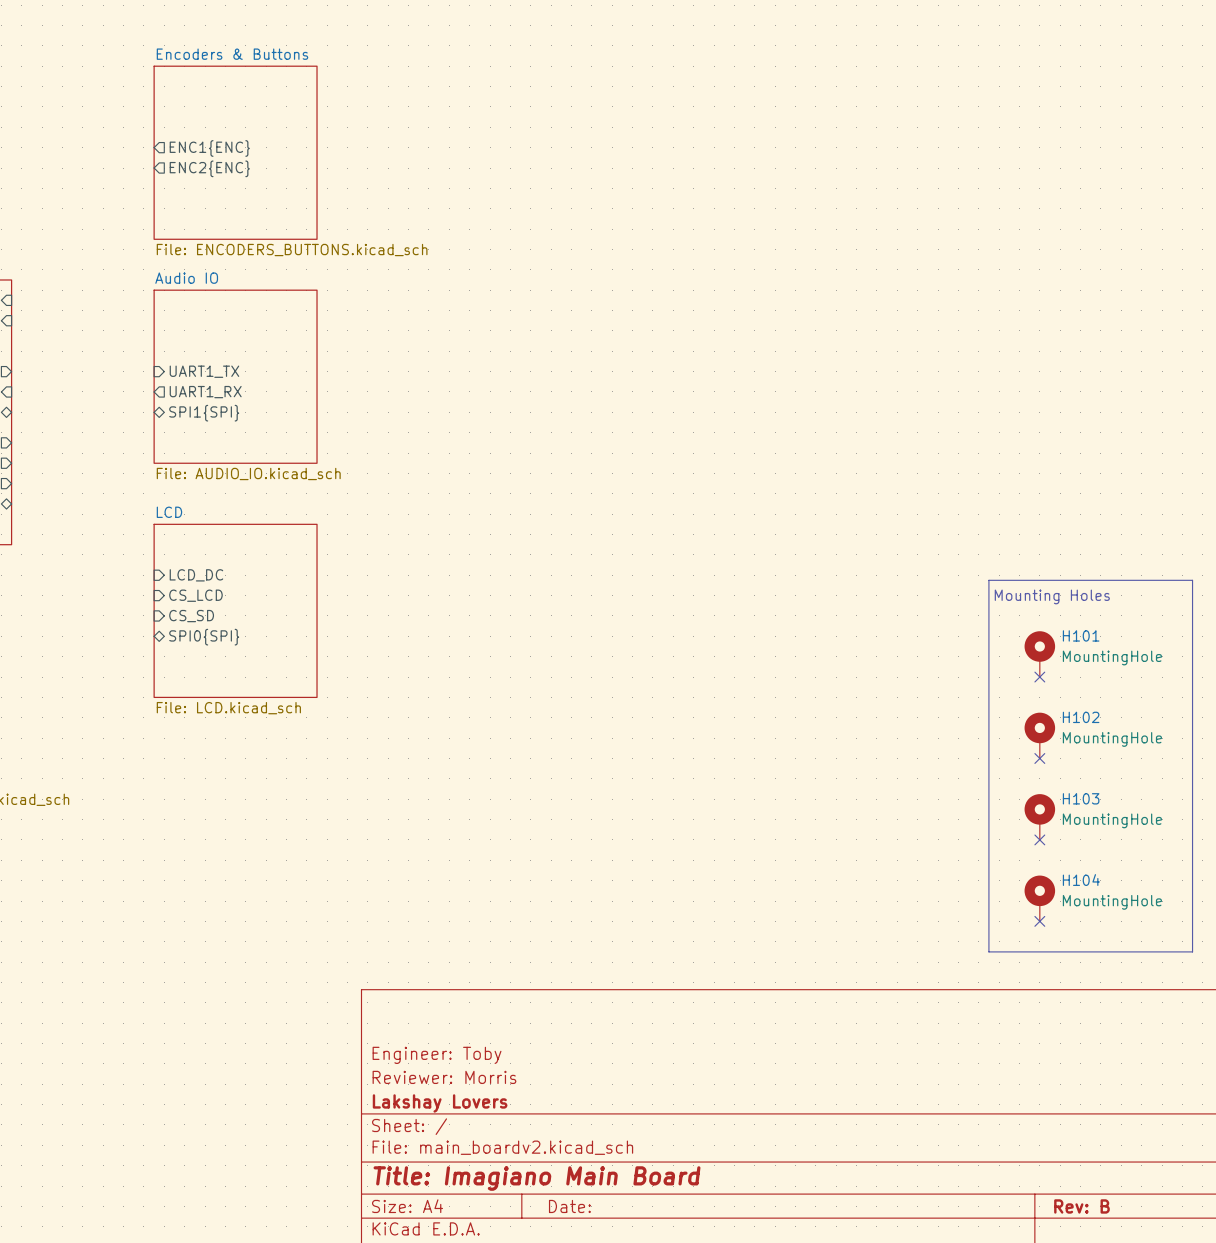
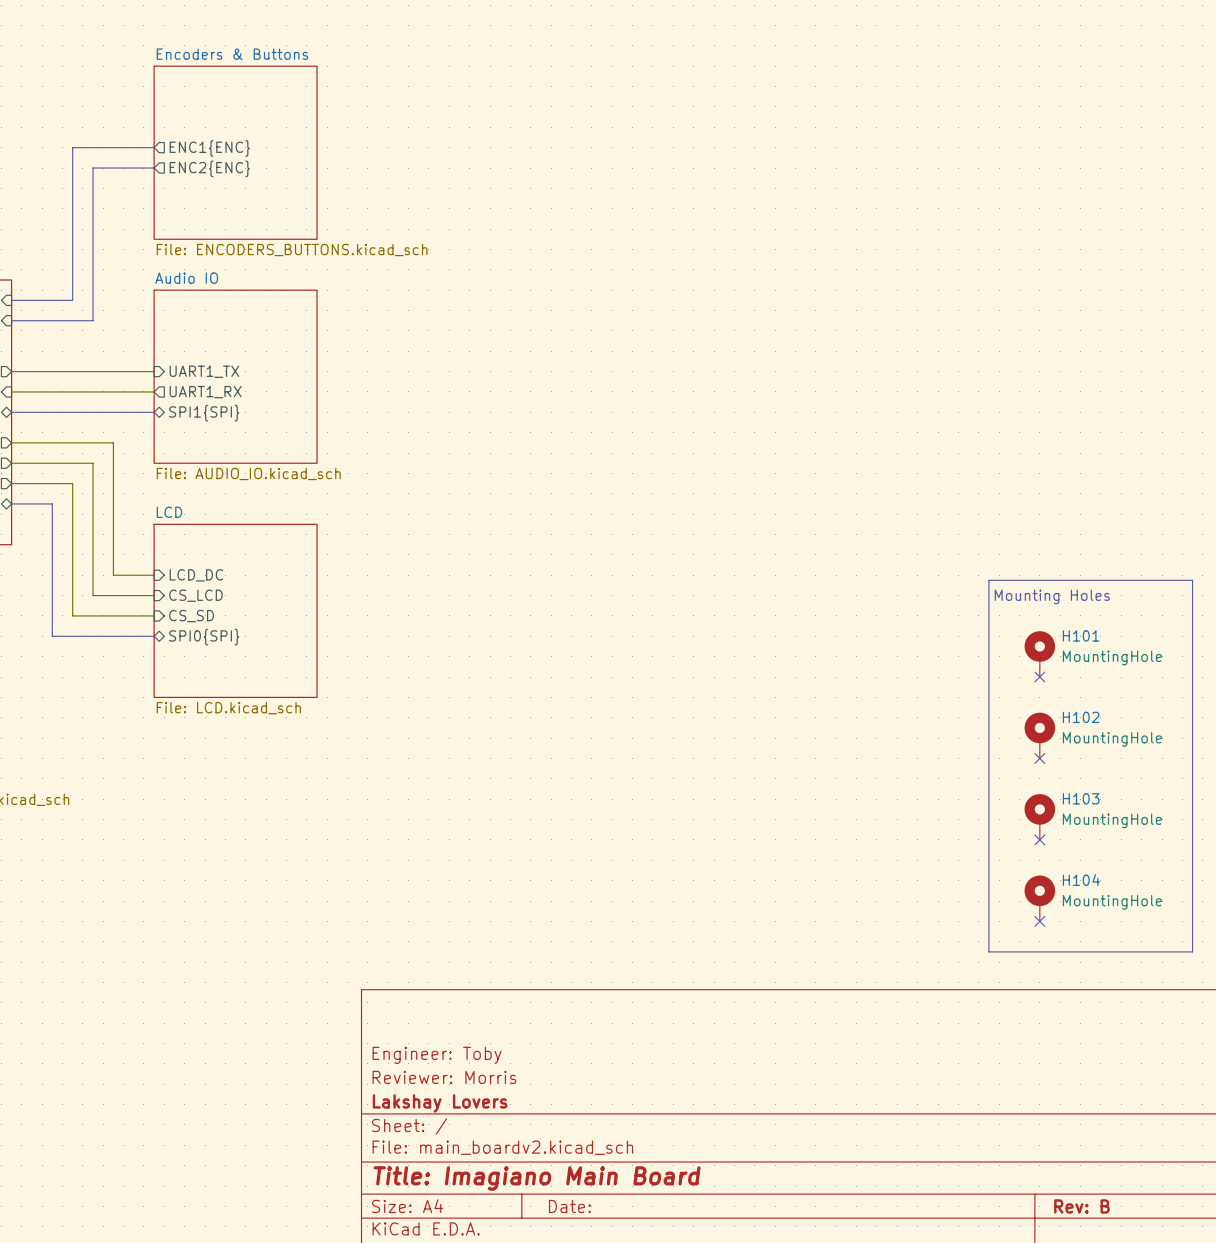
bus: none -> (154, 147) (72, 147) (72, 300) (11, 300)
bus: none -> (154, 168) (93, 168) (93, 320) (11, 320)
wire: none -> (11, 371) (154, 371)
wire: none -> (11, 391) (154, 391)
bus: none -> (11, 412) (154, 412)
wire: none -> (11, 442) (113, 442) (113, 575) (154, 575)
wire: none -> (11, 463) (93, 463) (93, 595) (154, 595)
wire: none -> (11, 483) (72, 483) (72, 615) (154, 615)
bus: none -> (11, 503) (52, 503) (52, 636) (154, 636)

